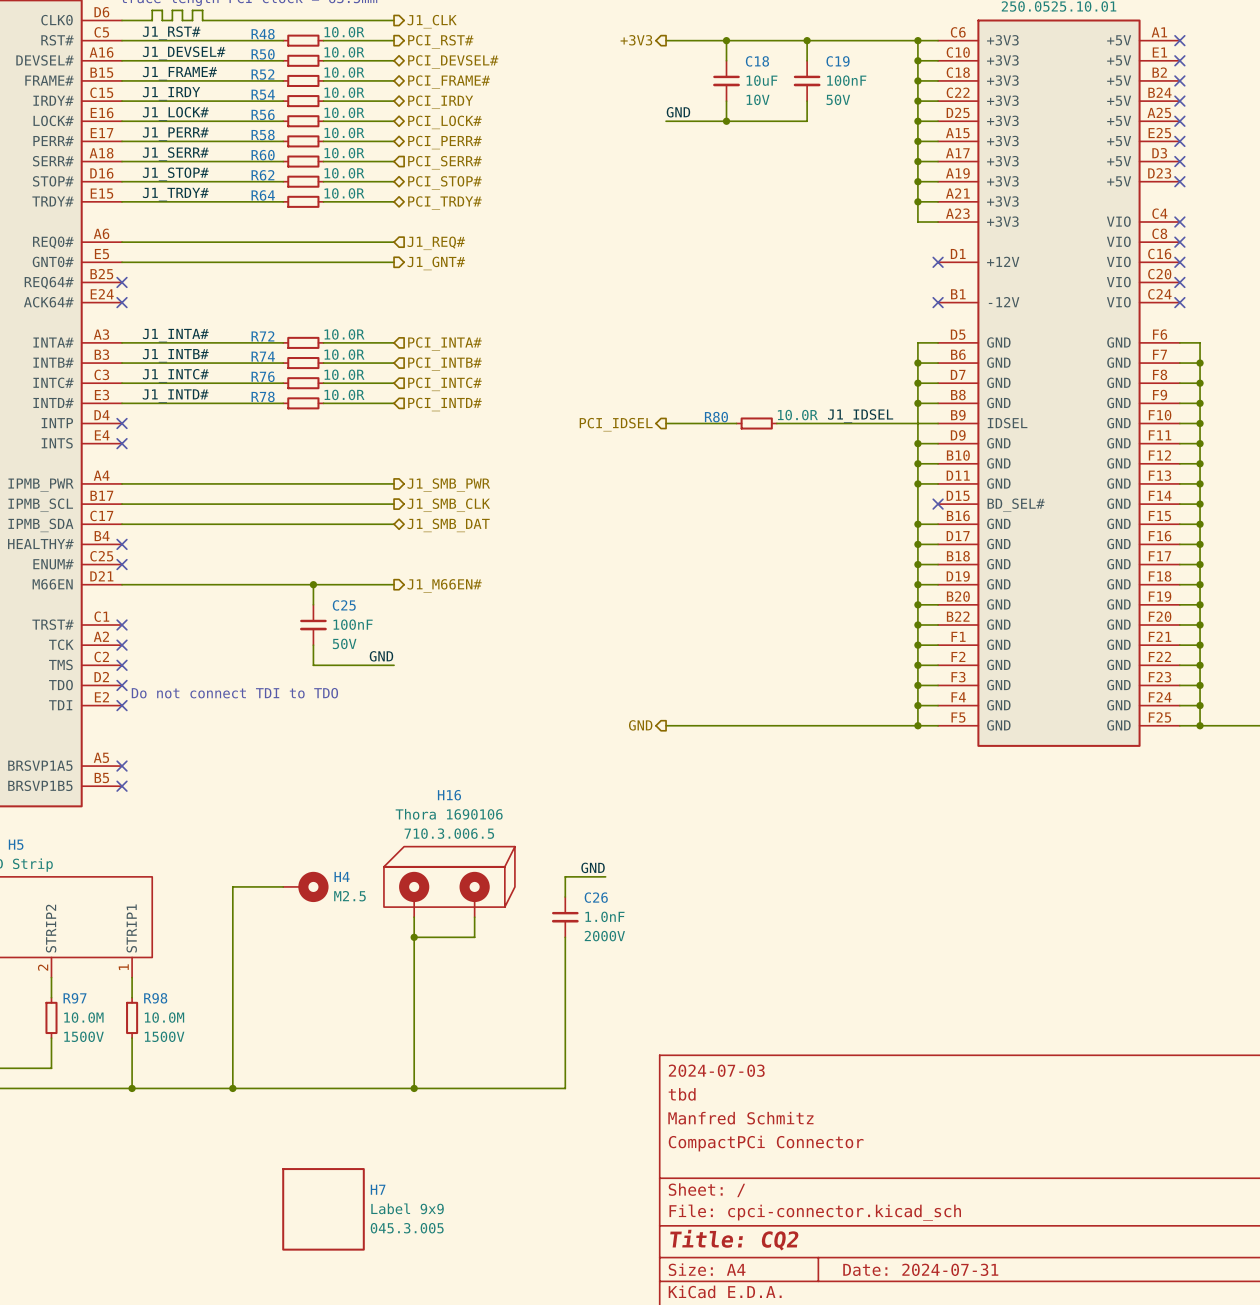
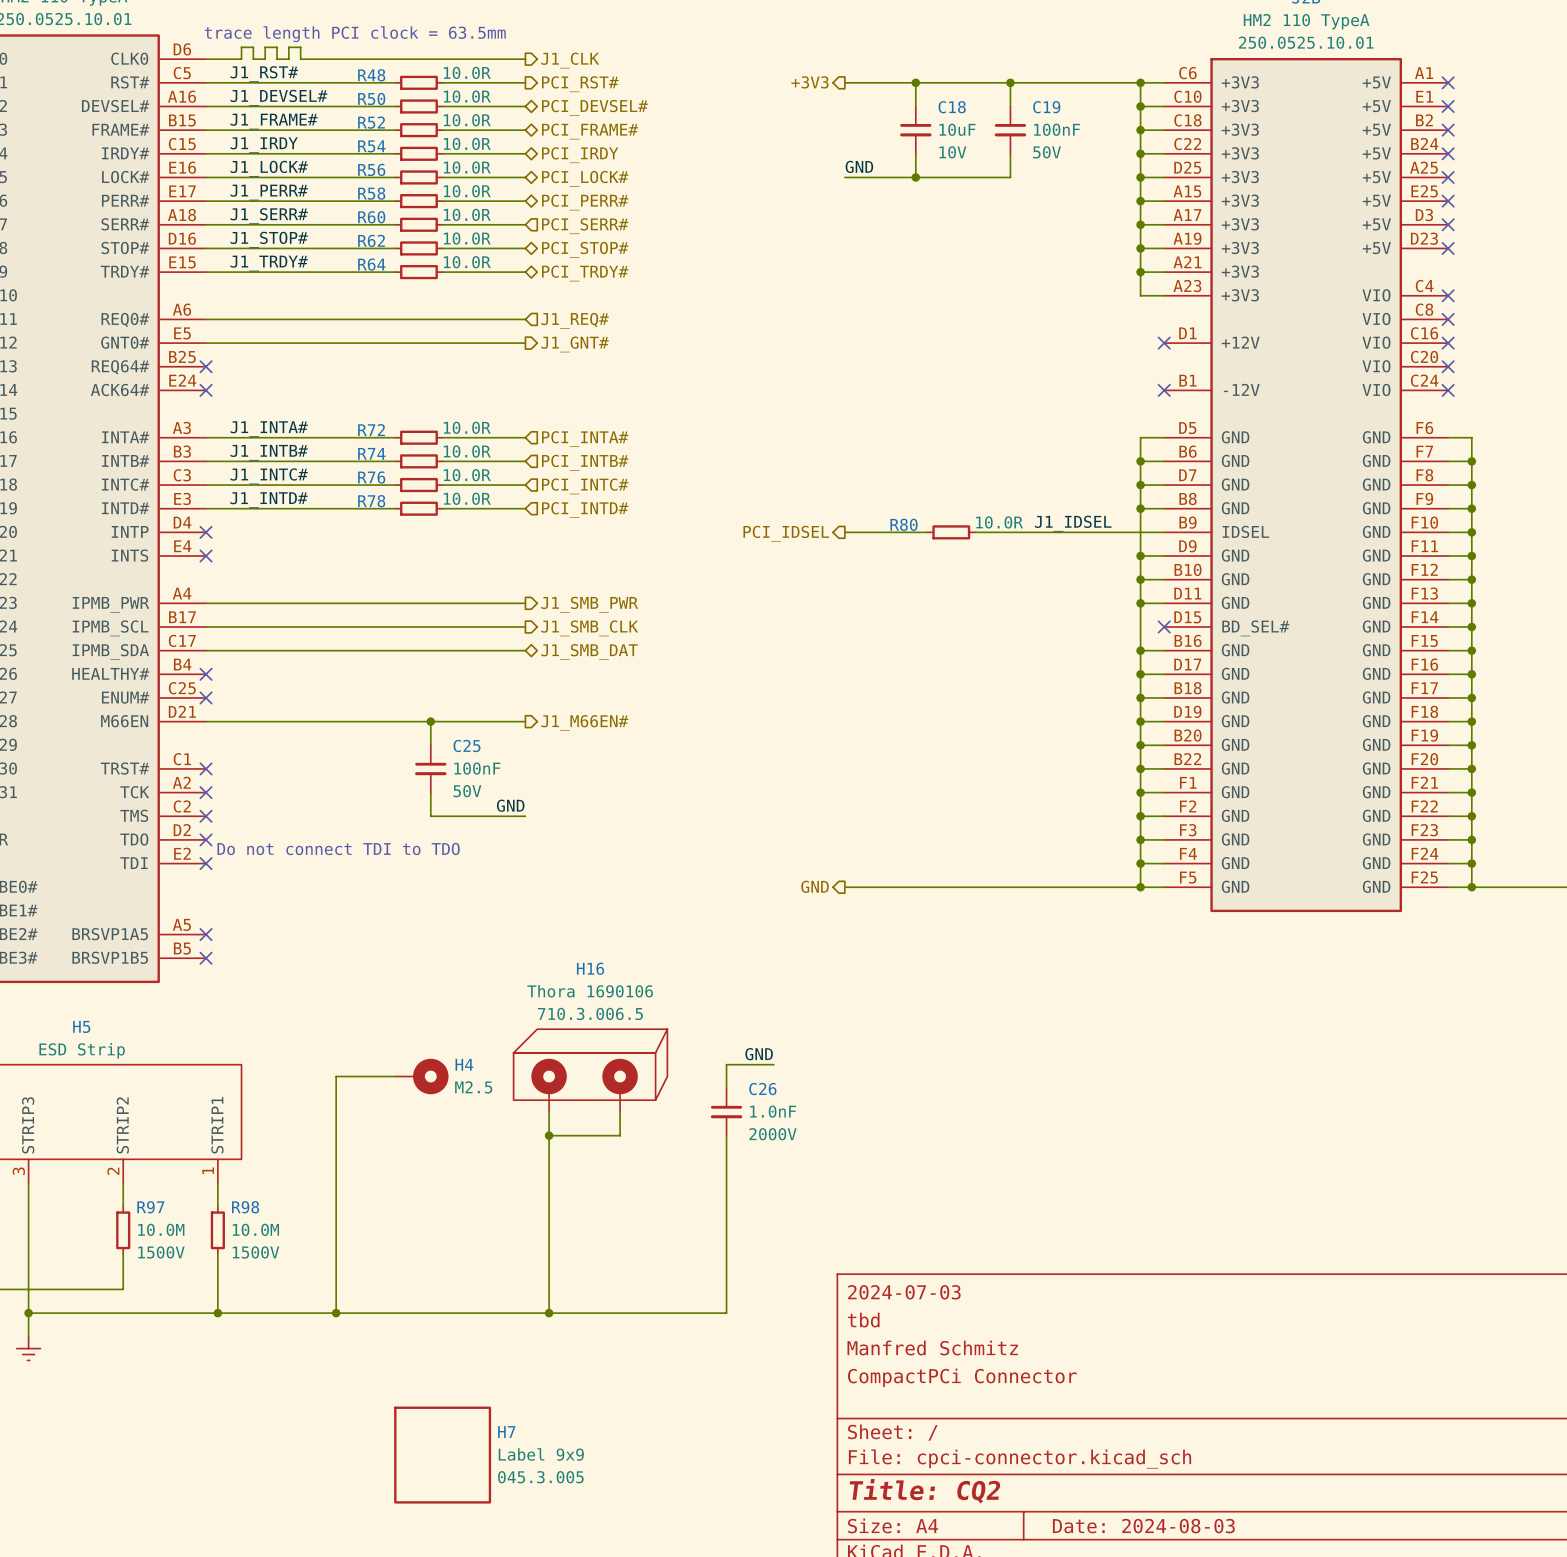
title block: Date: 2024-07-31 (920, 1269) -> Date: 2024-08-03 (1143, 1526)

